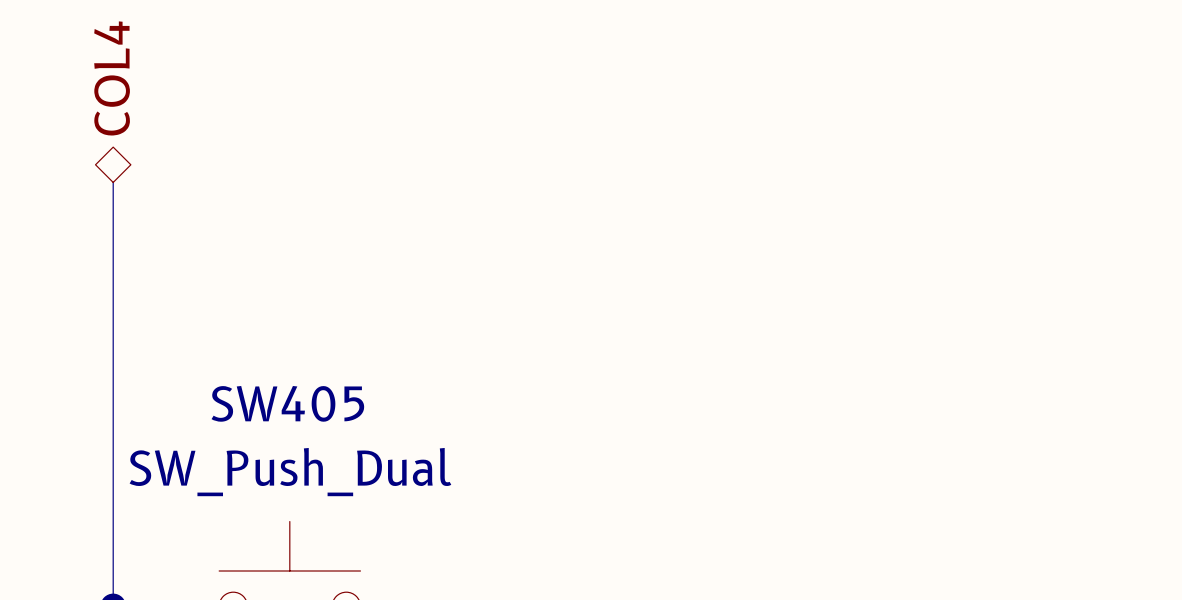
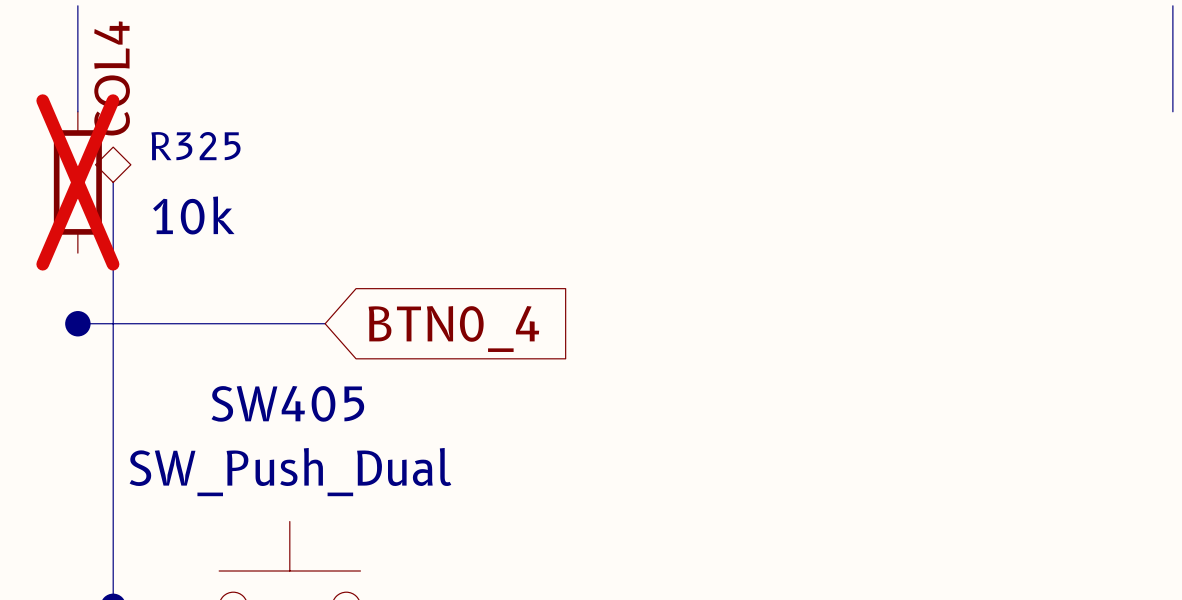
wire: none -> (77, 5) (77, 111)
wire: none -> (1172, 5) (1172, 111)
R325: none -> 10k (77, 182)
wire: none -> (77, 323) (325, 323)
junction: none -> (77, 323)
global label: none -> BTN0_4 (453, 329)

